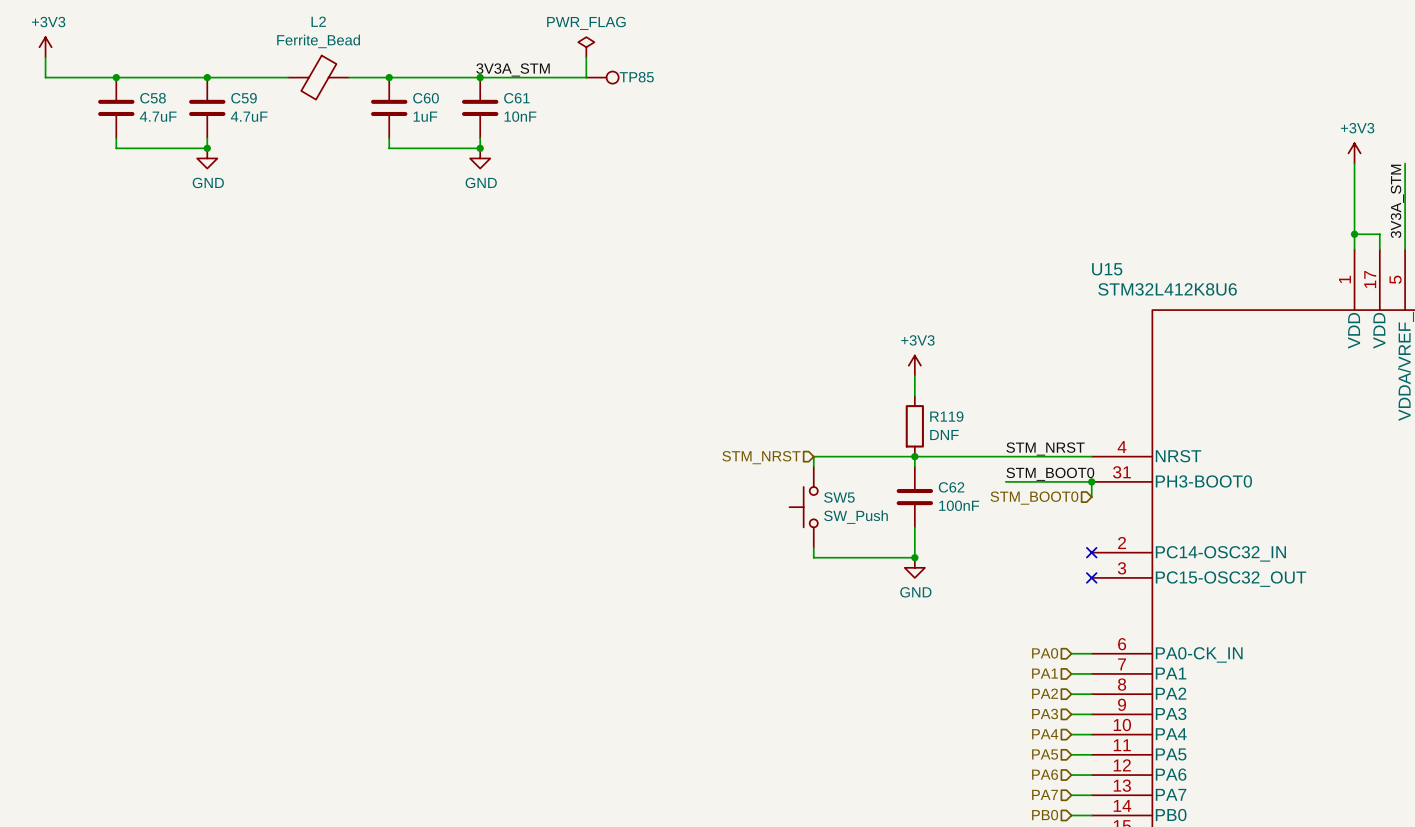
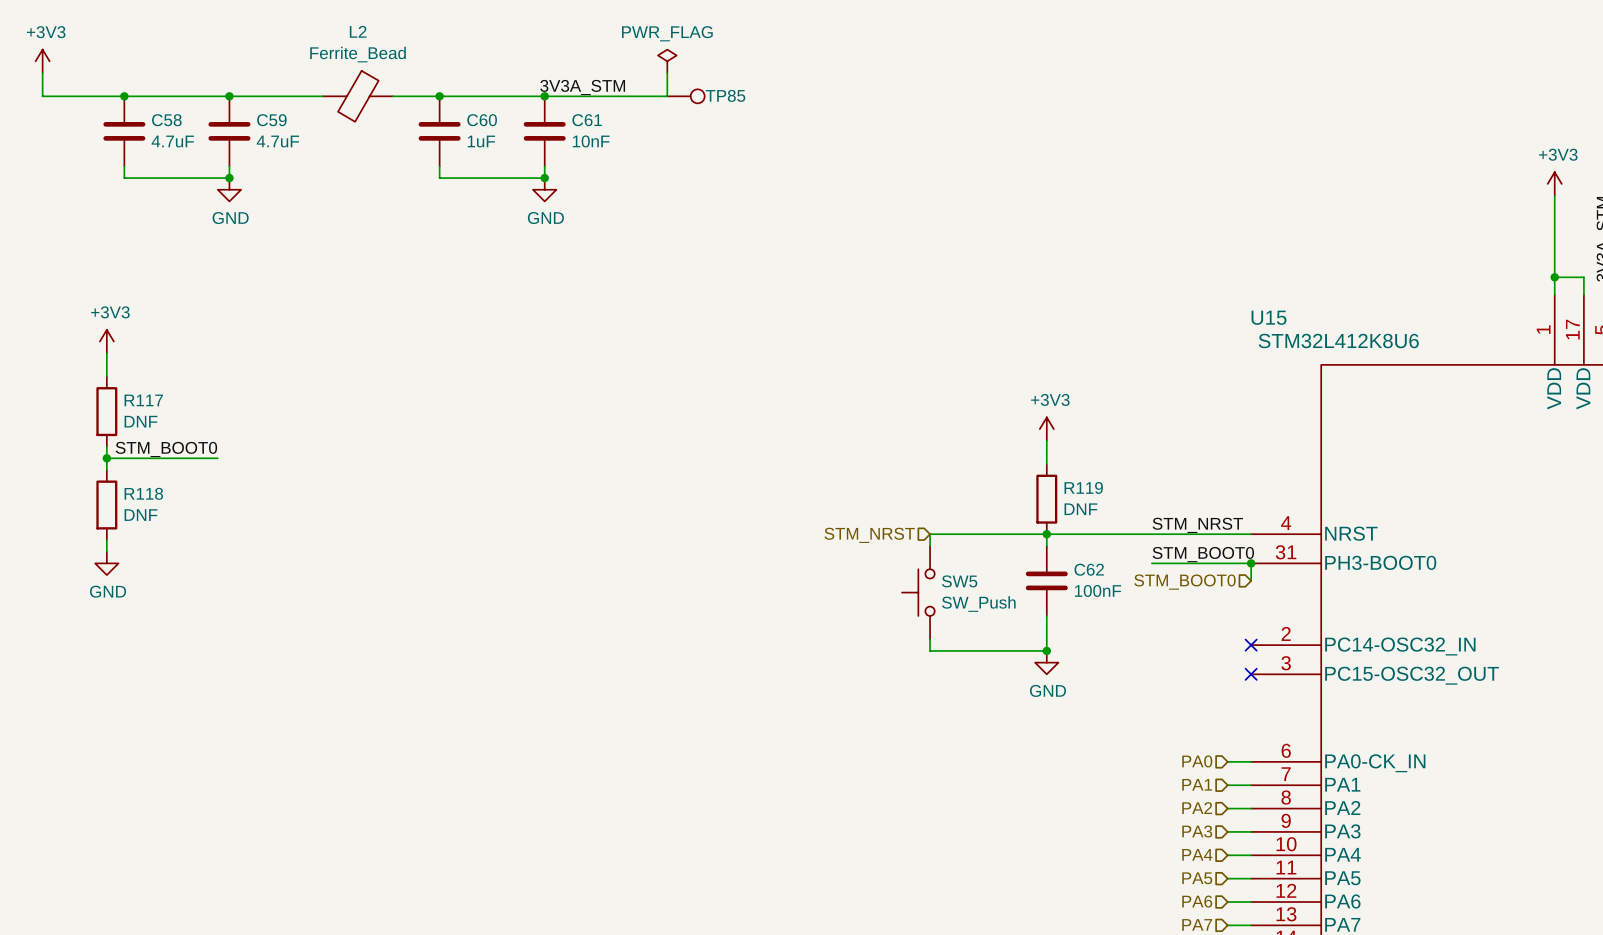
power symbol: none -> +3V3 (106, 341)
wire: none -> (106, 353) (106, 376)
R117: none -> DNF (106, 411)
wire: none -> (106, 446) (106, 469)
label: none -> STM_BOOT0 (166, 449)
wire: none -> (106, 458) (217, 458)
junction: none -> (106, 458)
R118: none -> DNF (106, 505)
wire: none -> (106, 540) (106, 551)
power symbol: none -> GND (106, 563)

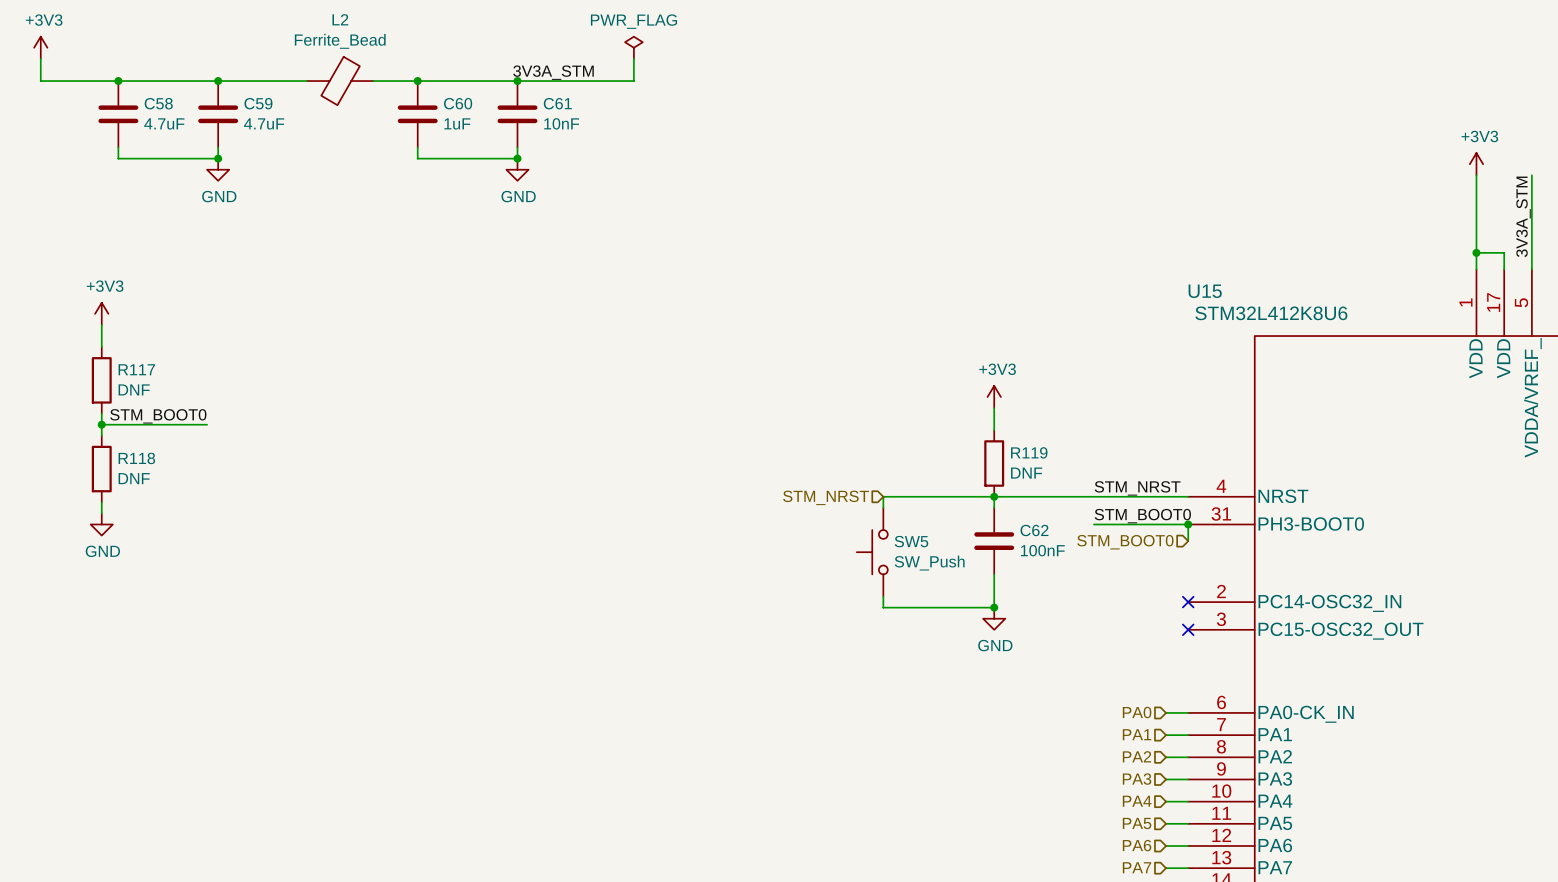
TP85: (686, 96) -> none

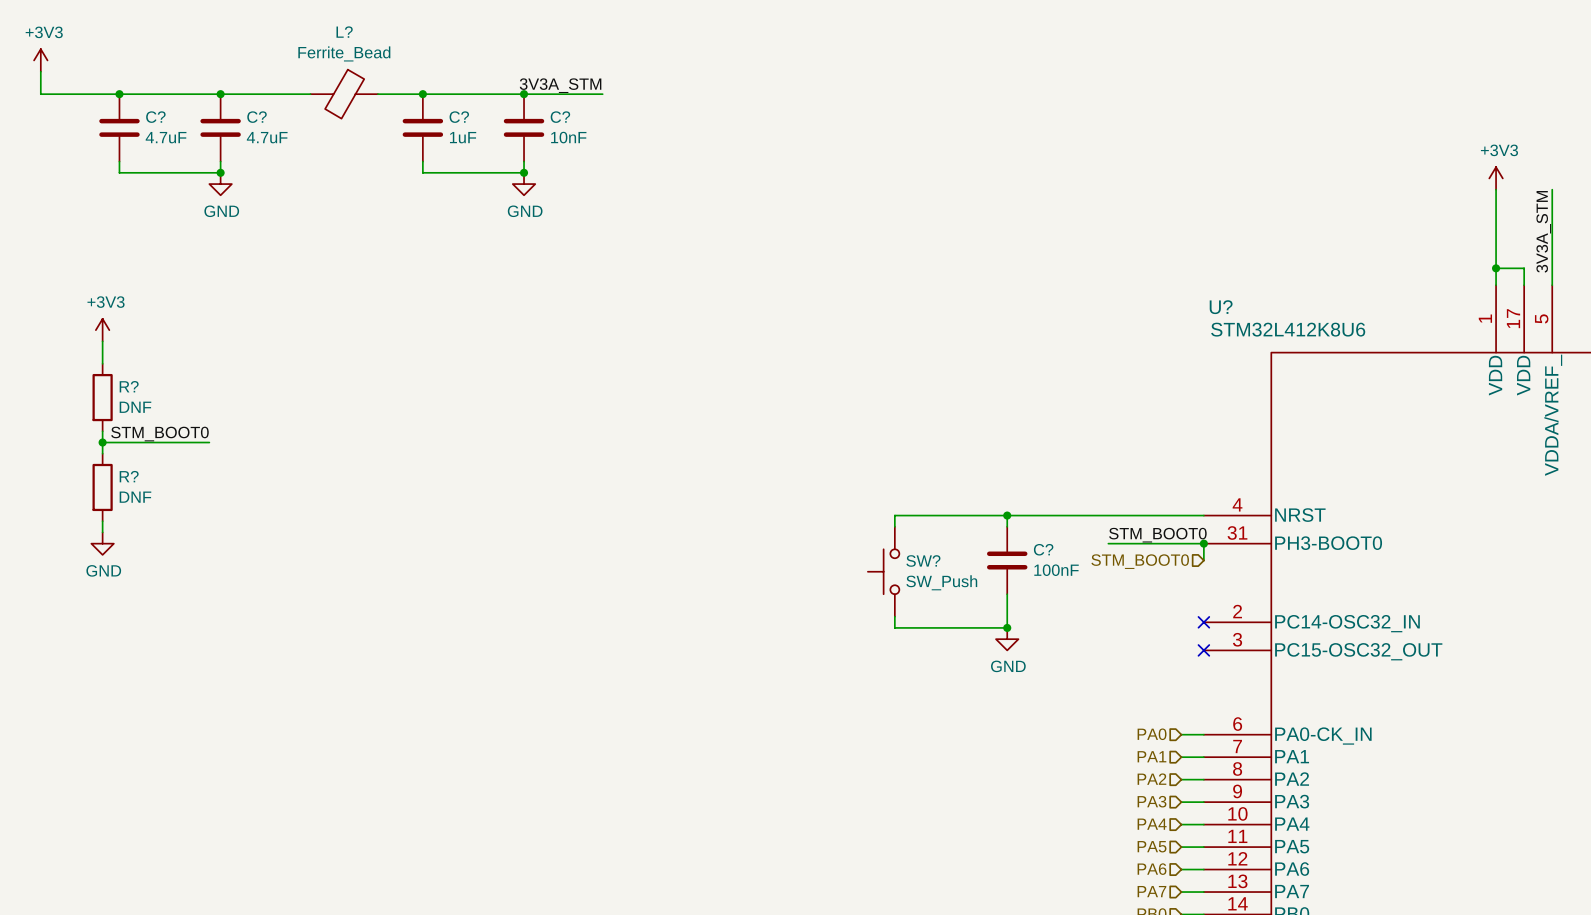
L2 name: L2 (340, 19) -> L? (344, 32)
power symbol: PWR_FLAG (633, 47) -> none
wire: (633, 58) (633, 81) (595, 81) -> none
C58 name: C58 (158, 103) -> C? (155, 117)
C59 name: C59 (258, 103) -> C? (257, 117)
C60 name: C60 (458, 103) -> C? (459, 117)
C61 name: C61 (557, 103) -> C? (560, 117)
U15 name: U15 (1205, 291) -> U? (1221, 307)
R117 name: R117 (136, 369) -> R? (129, 386)
power symbol: +3V3 (994, 396) -> none
wire: (994, 408) (994, 430) -> none
R118 name: R118 (136, 458) -> R? (129, 476)
R119: DNF (994, 463) -> none
label: STM_NRST (1137, 488) -> none
hierarchical label: STM_NRST (826, 497) -> none
C62 name: C62 (1034, 530) -> C? (1043, 549)
SW5 name: SW5 (911, 541) -> SW? (923, 560)

